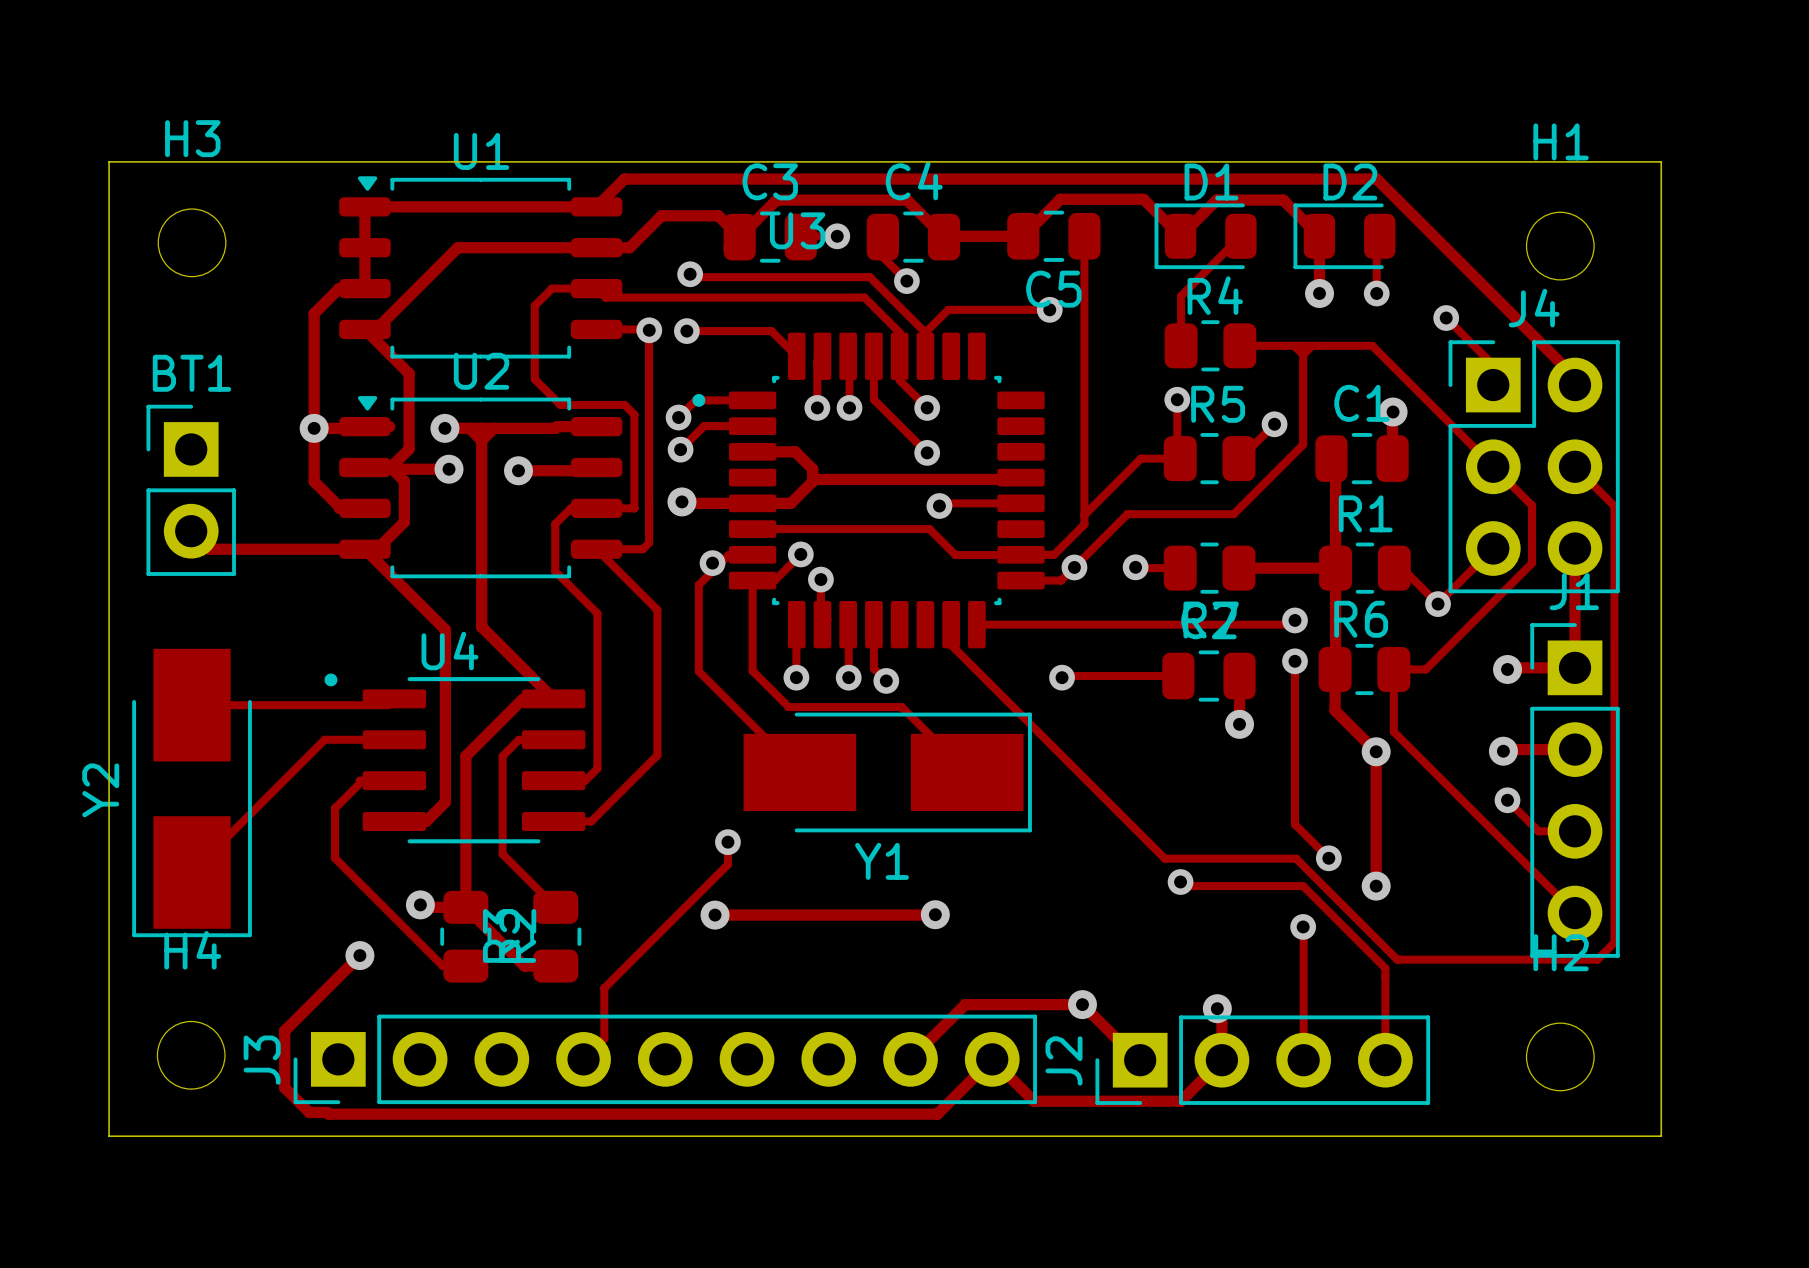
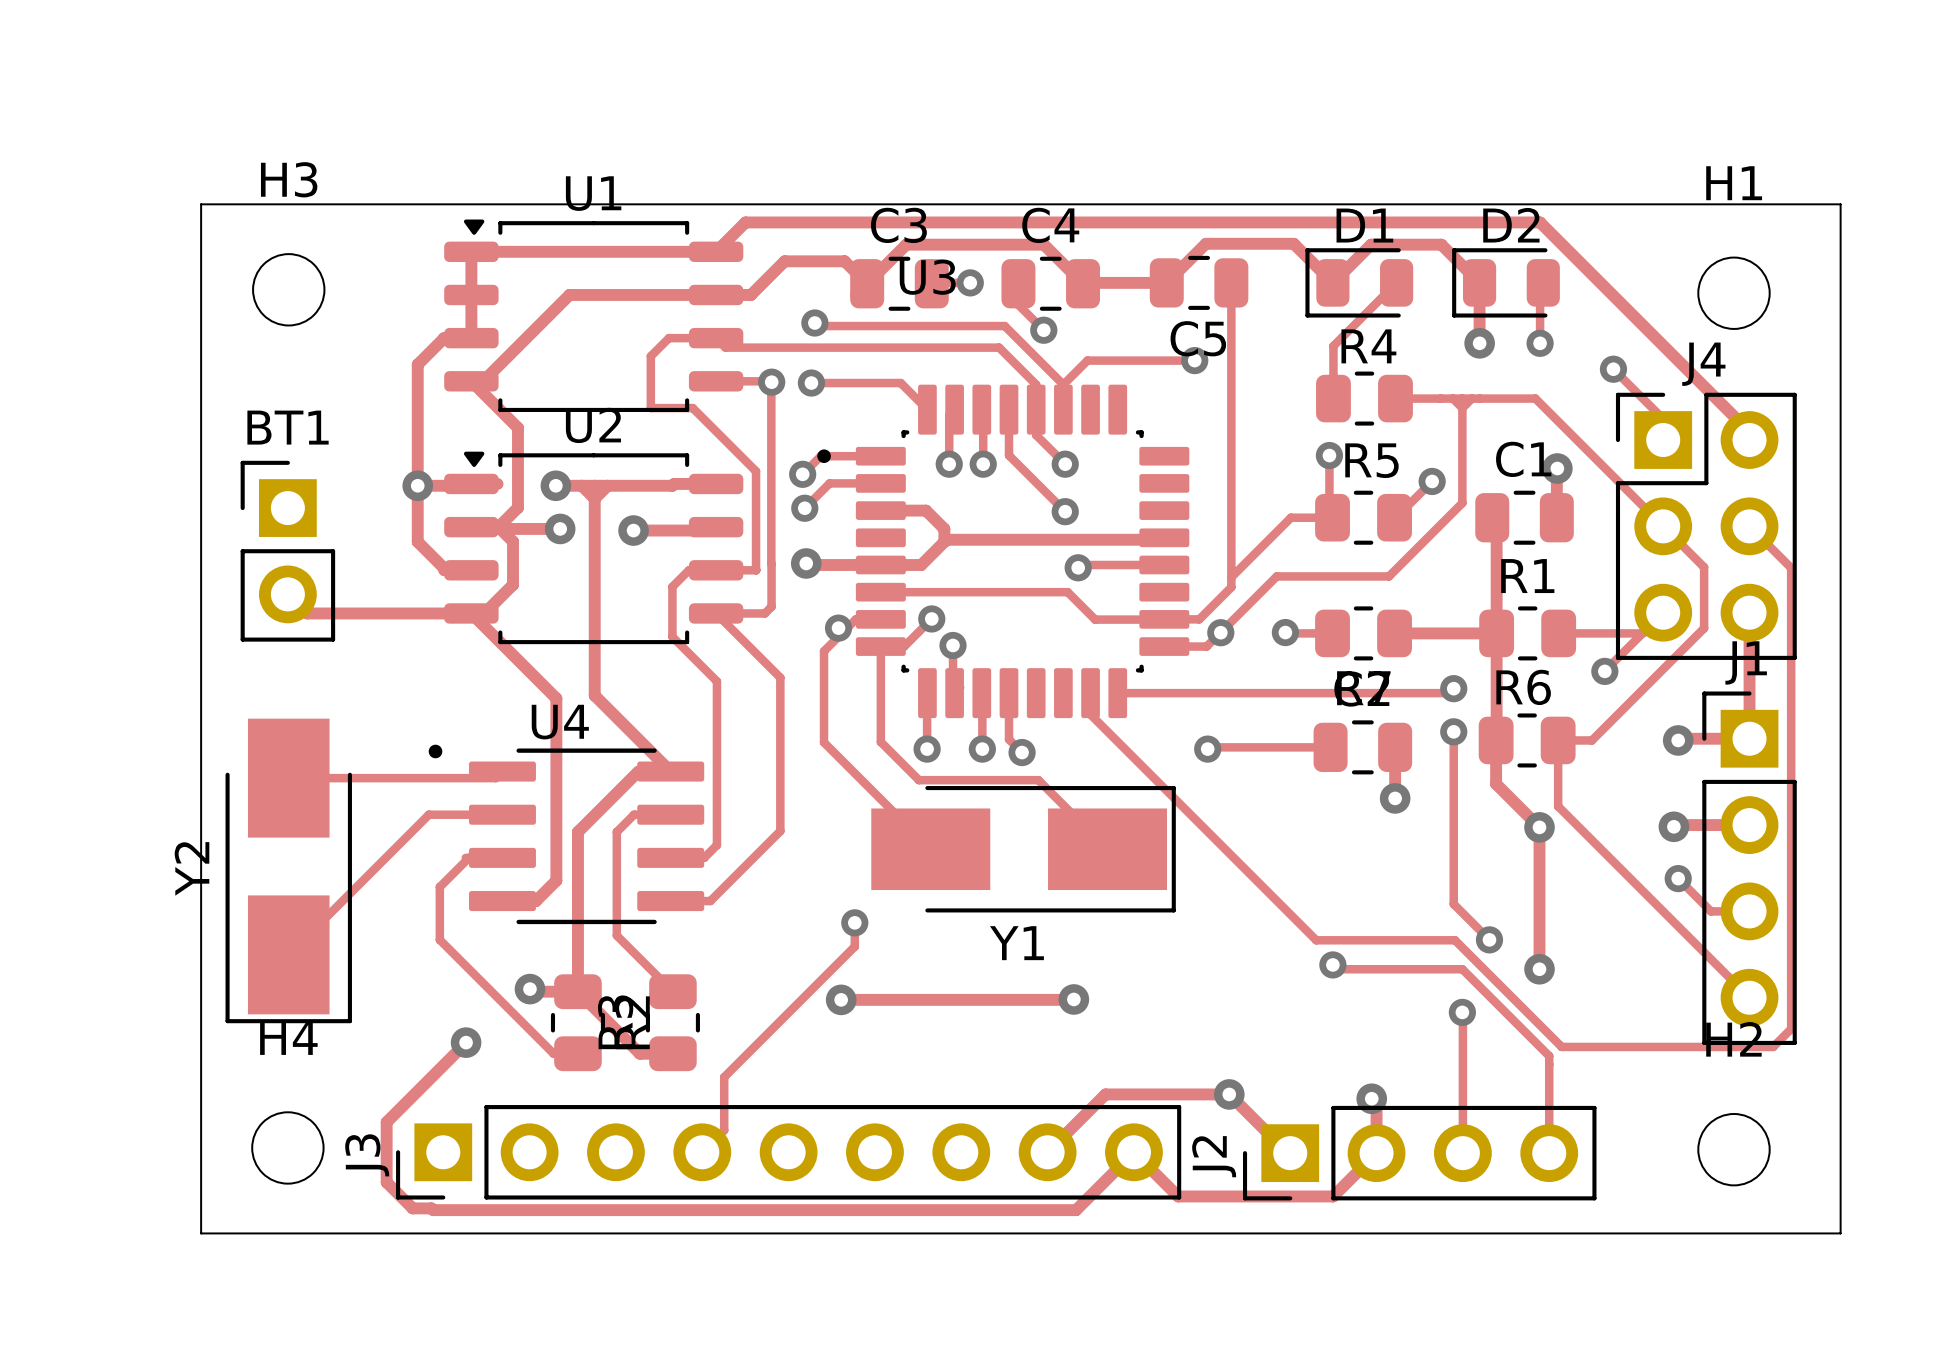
track: (534, 354) (534, 379) (560, 404) (624, 404) -> (650, 408) (692, 408) (745, 461)
track: (1402, 568) (1438, 604) -> (1566, 633) (1642, 633)

